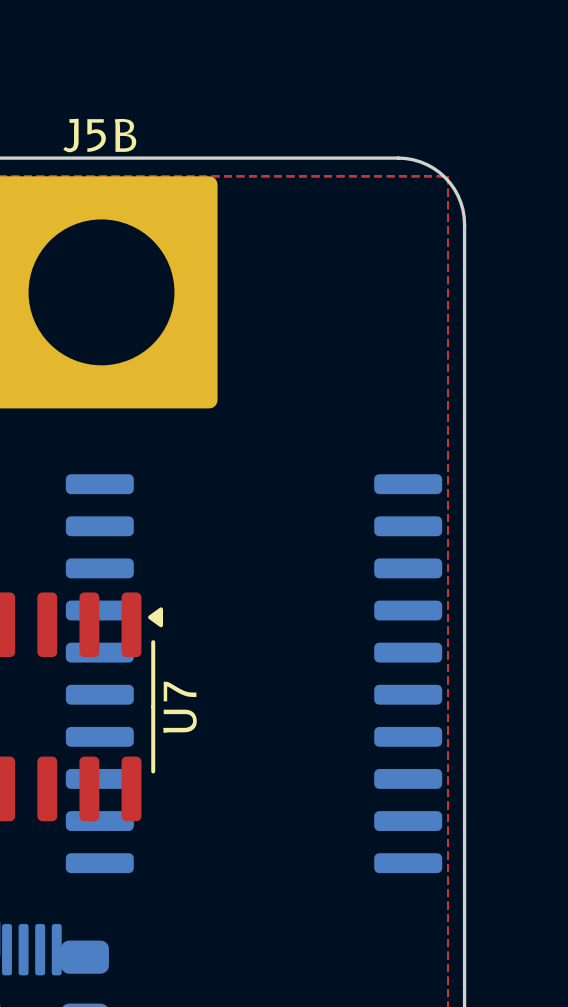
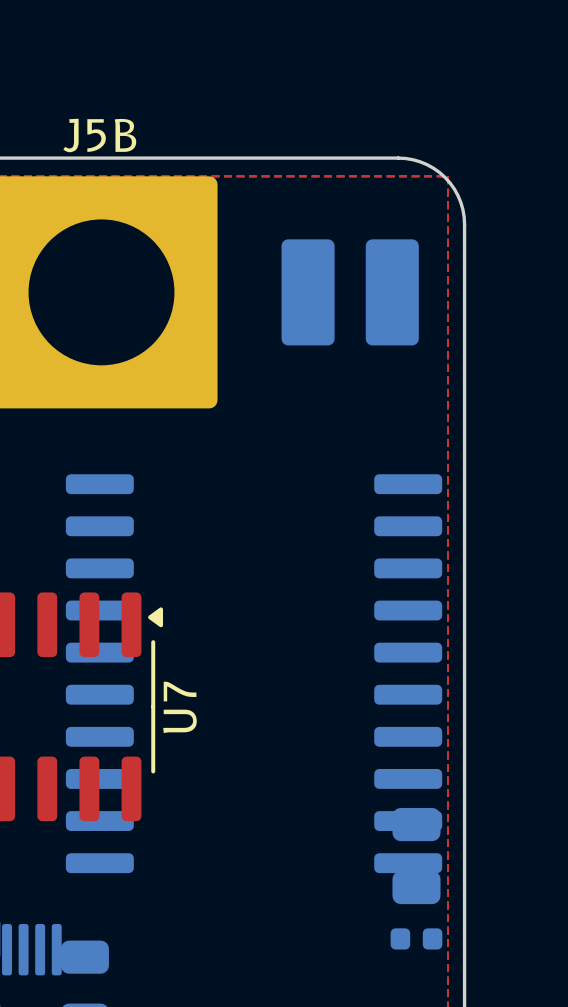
part: none -> (350, 292)
part: none -> (416, 856)
part: none -> (416, 938)

